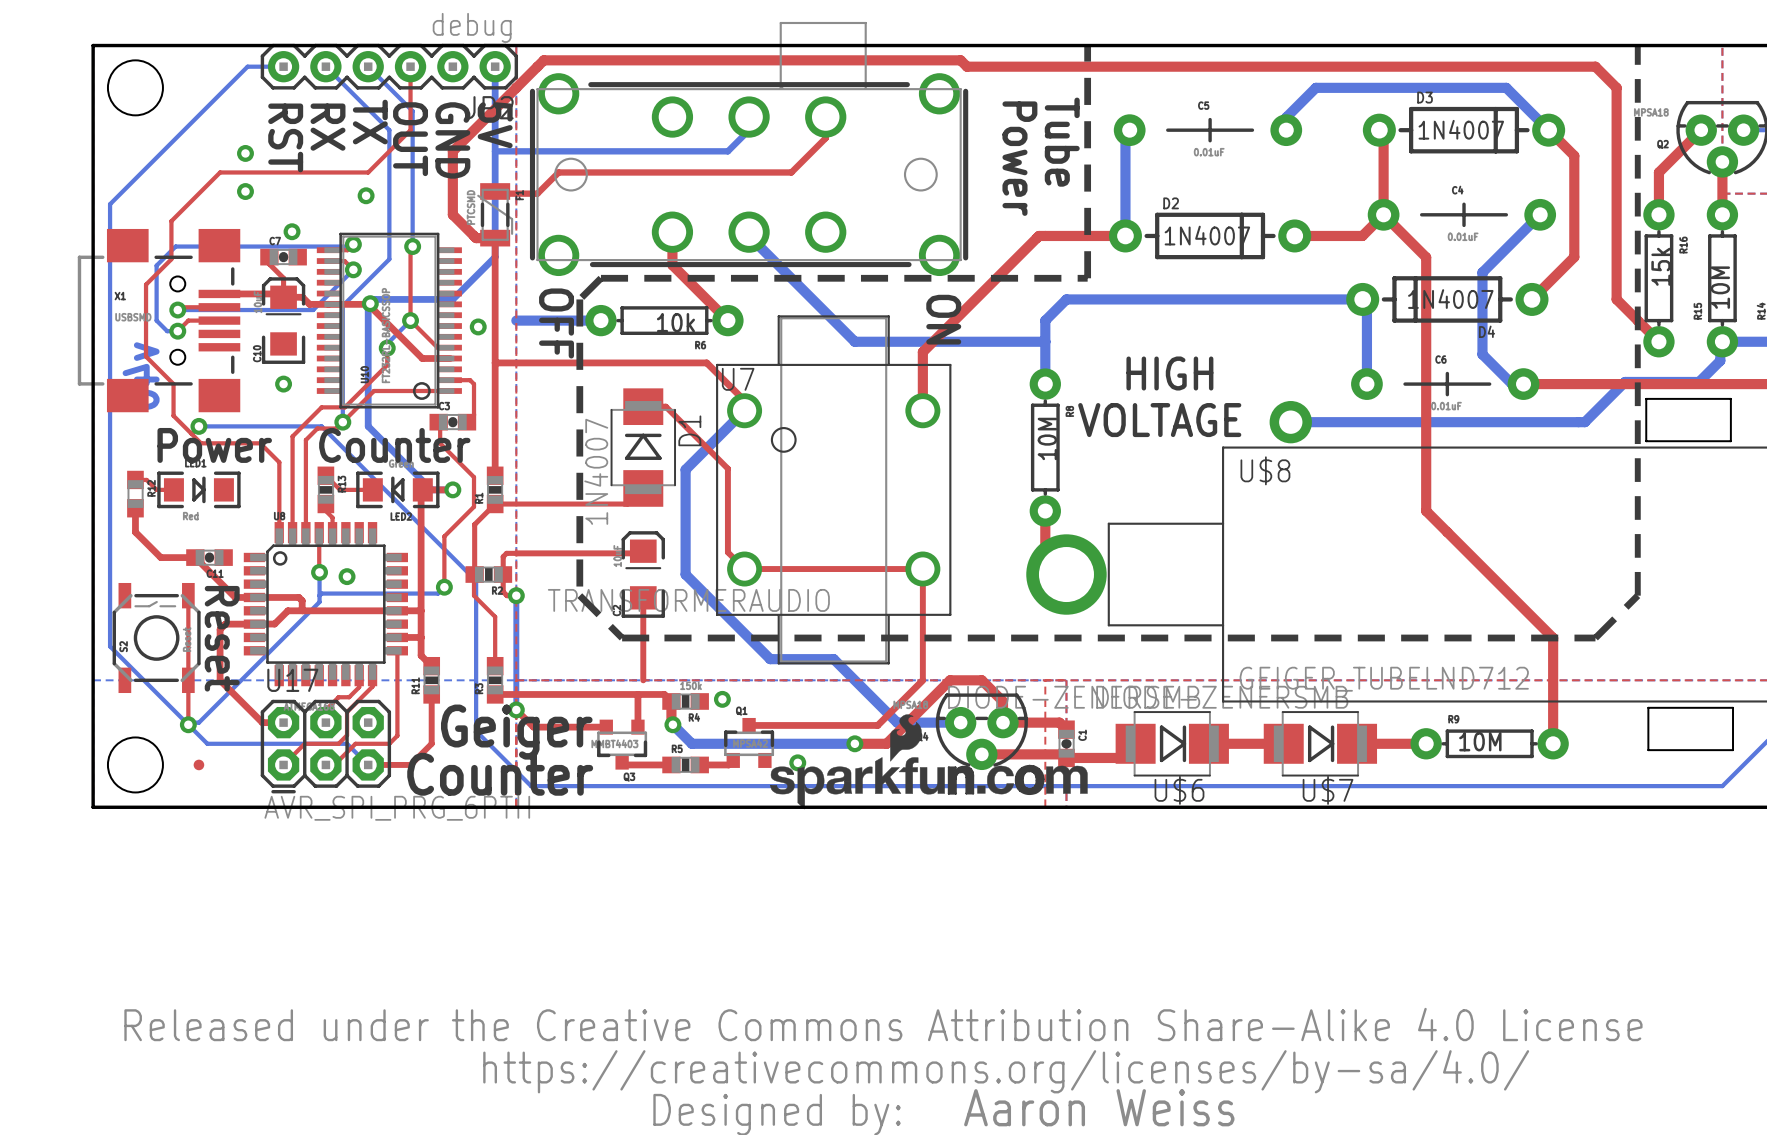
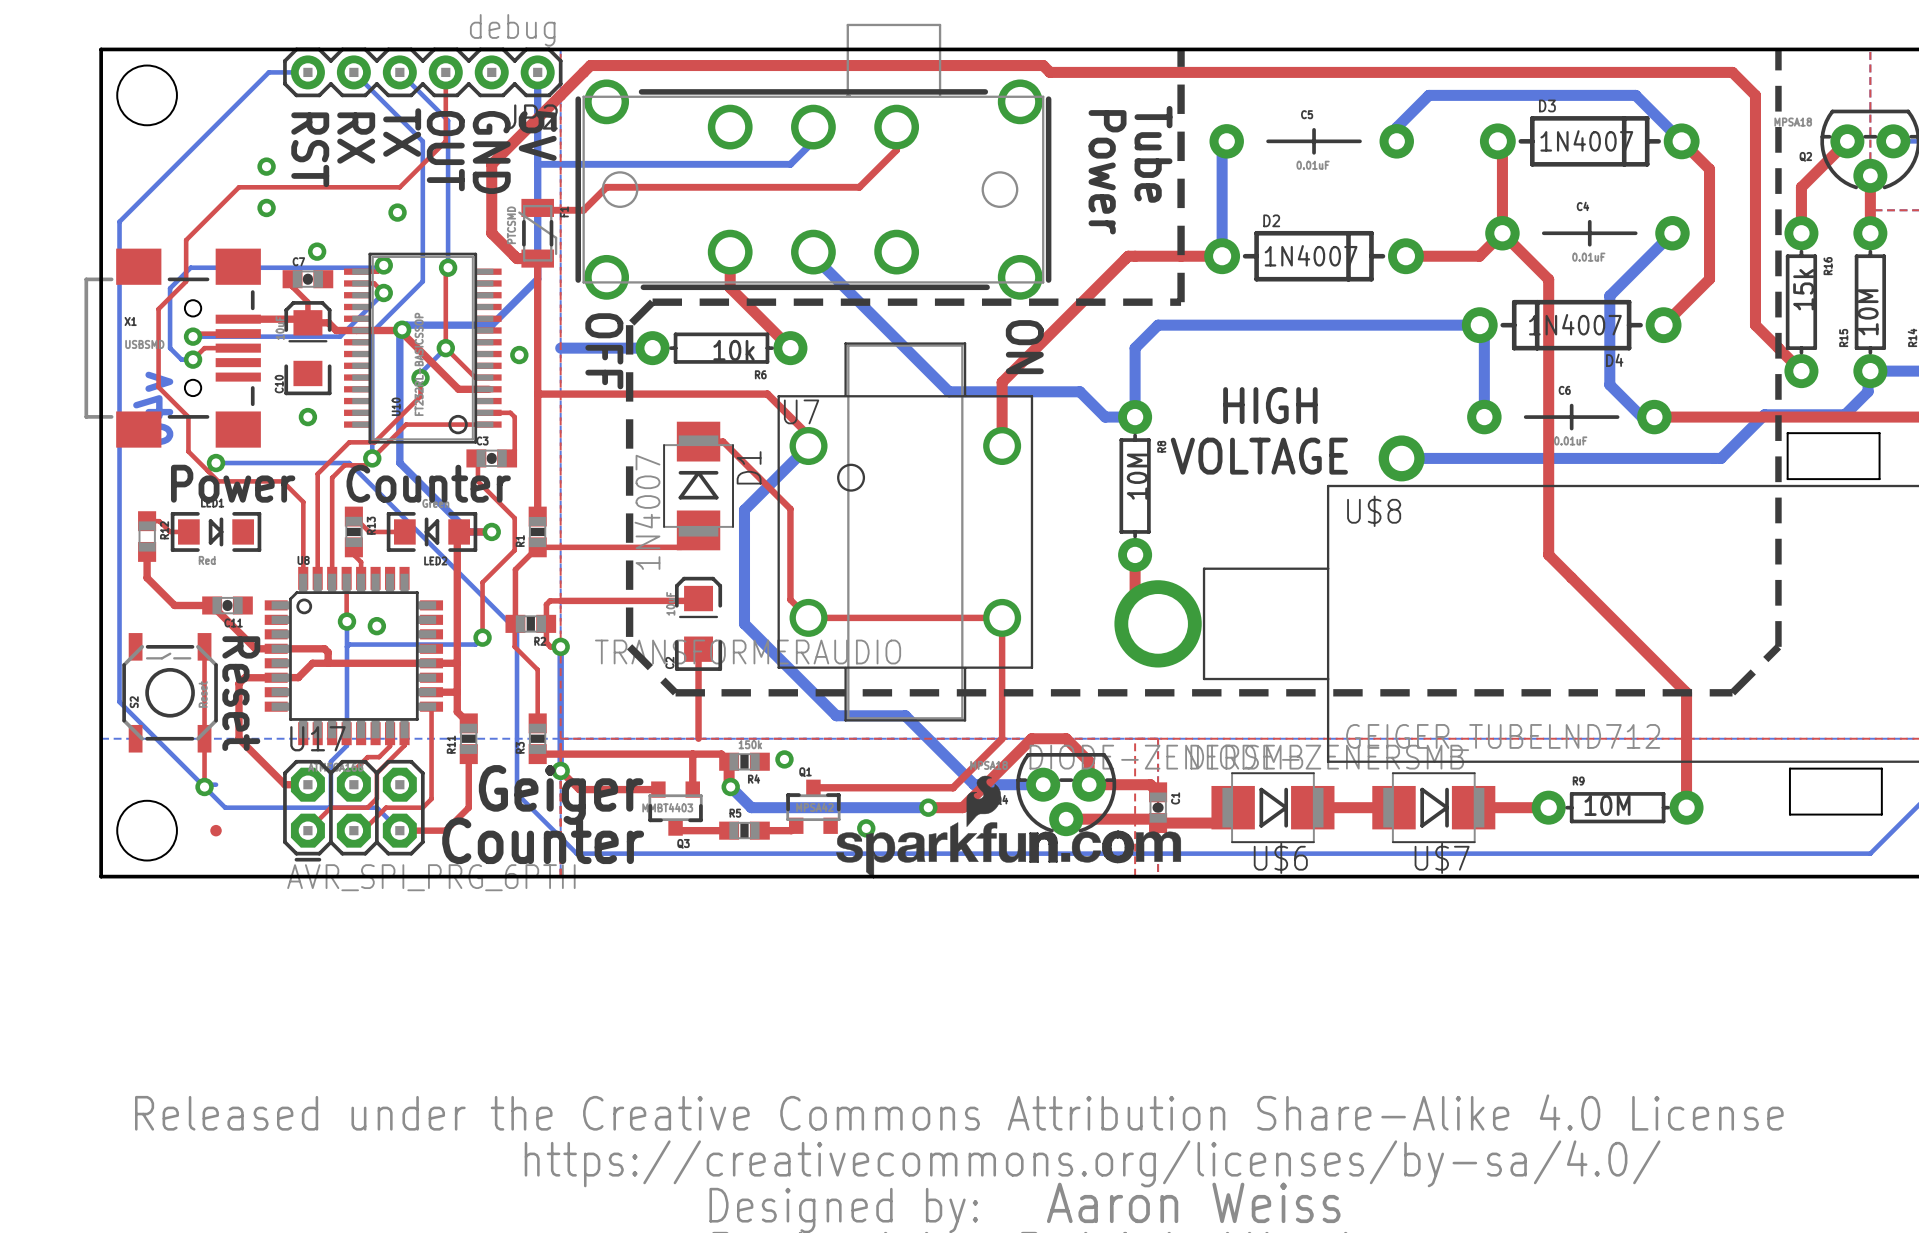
bottom track: (854, 341) (1045, 341) -> (928, 371) (948, 391) (1079, 391) (1105, 417) (1135, 417)
bottom track: (319, 602) (198, 722) -> (346, 653) (346, 745) (330, 761) (330, 807)

